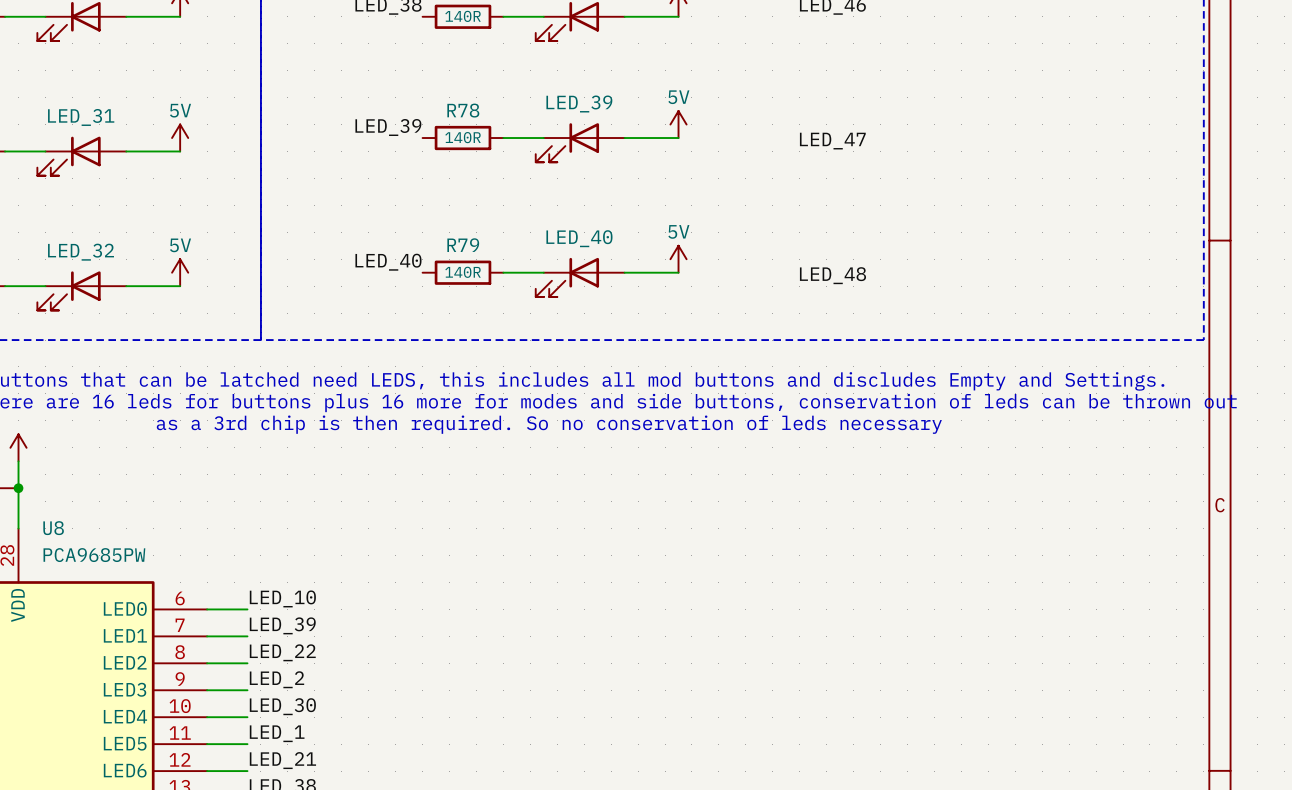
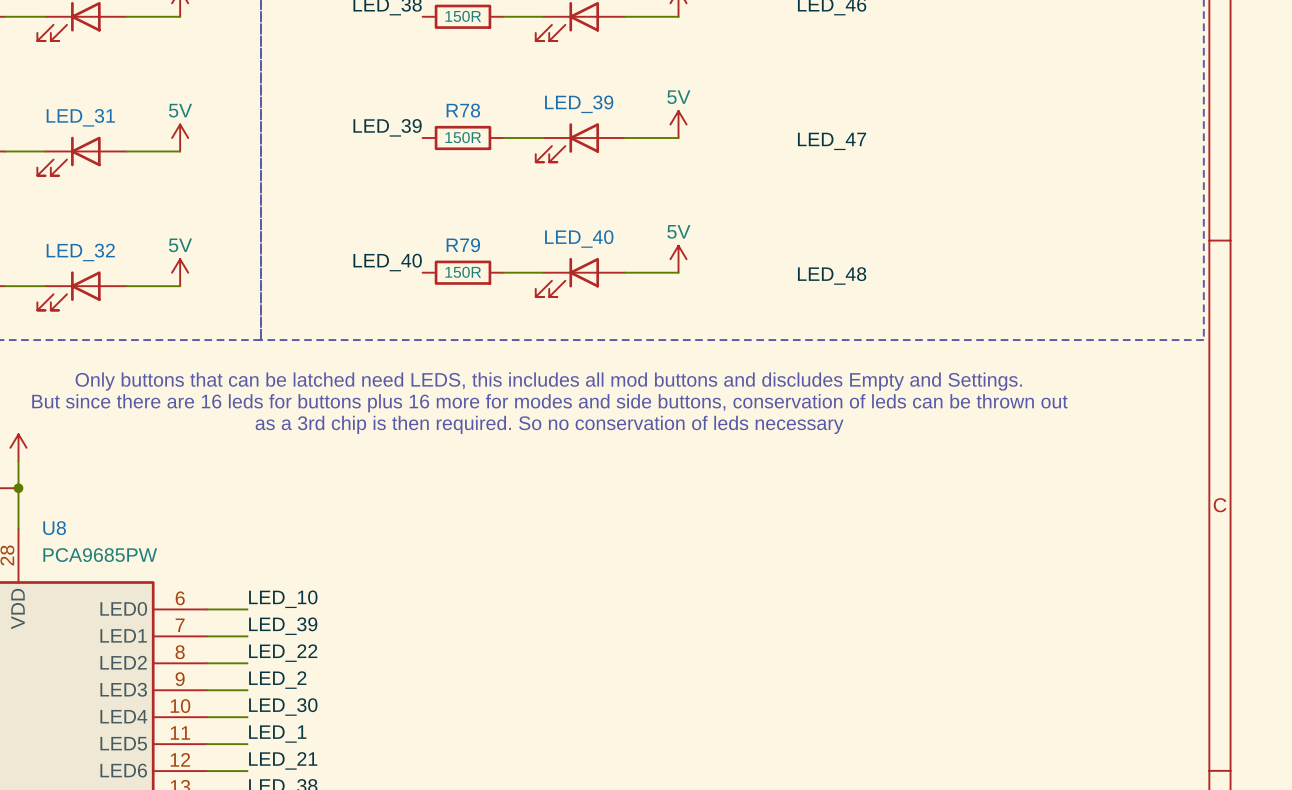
part value: 140R (463, 16) -> 150R (463, 16)
R78 value: 140R (463, 137) -> 150R (463, 137)
R79 value: 140R (463, 272) -> 150R (463, 272)

